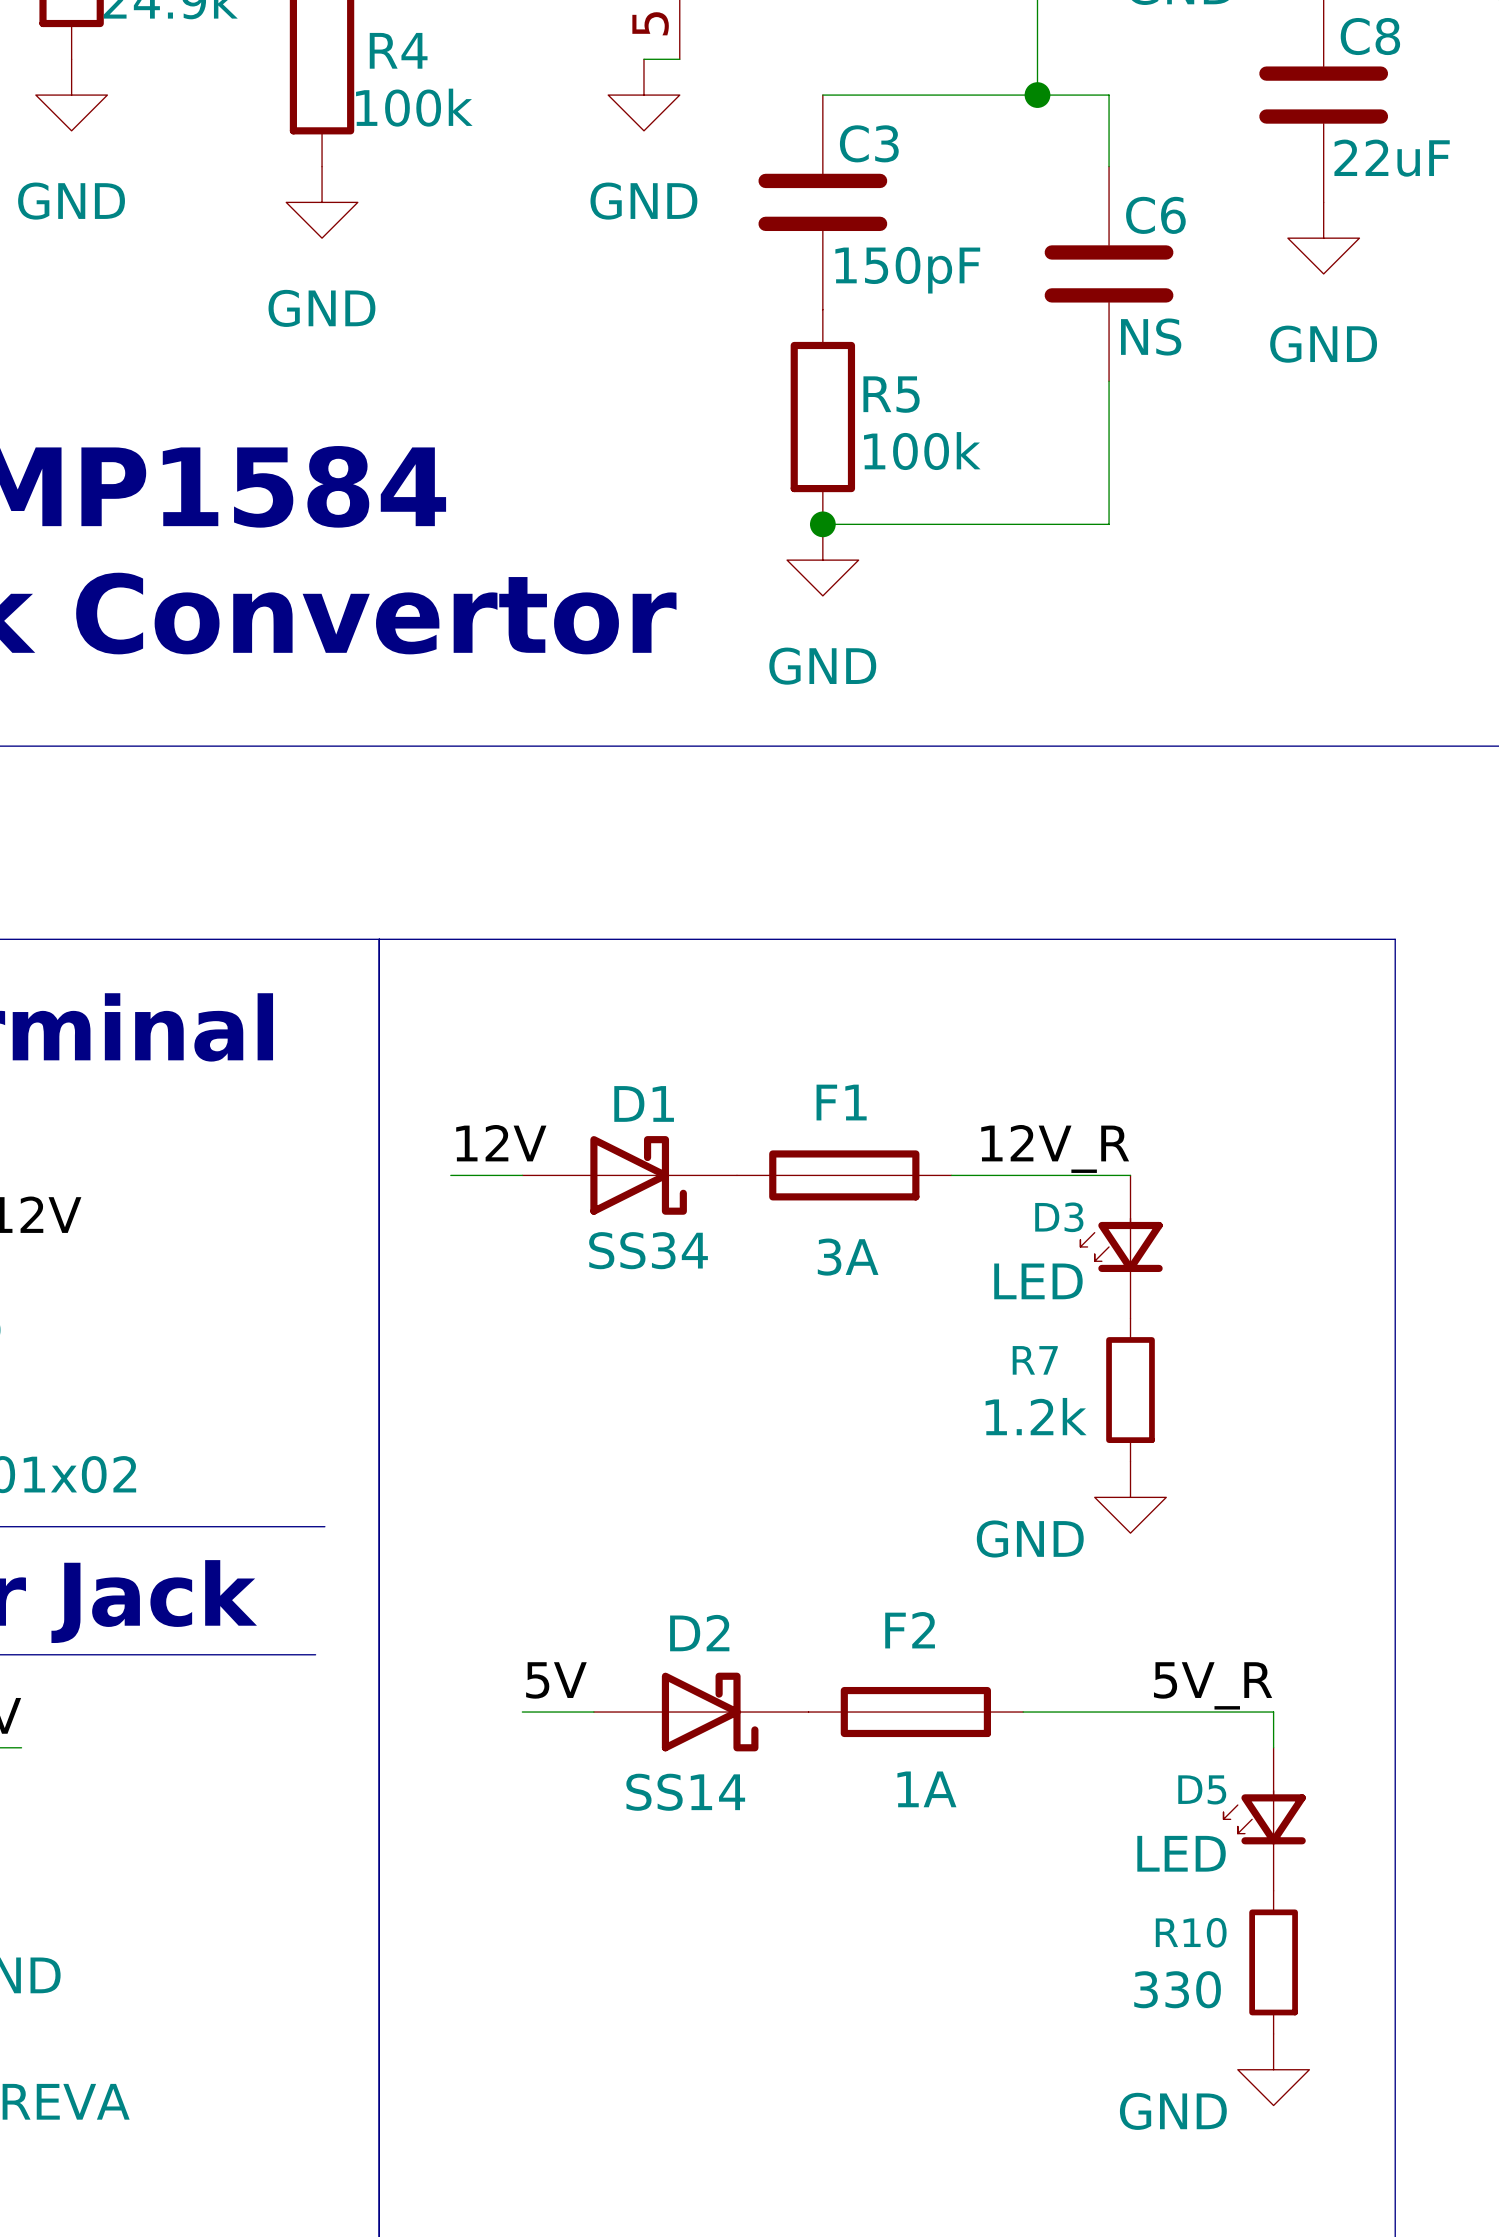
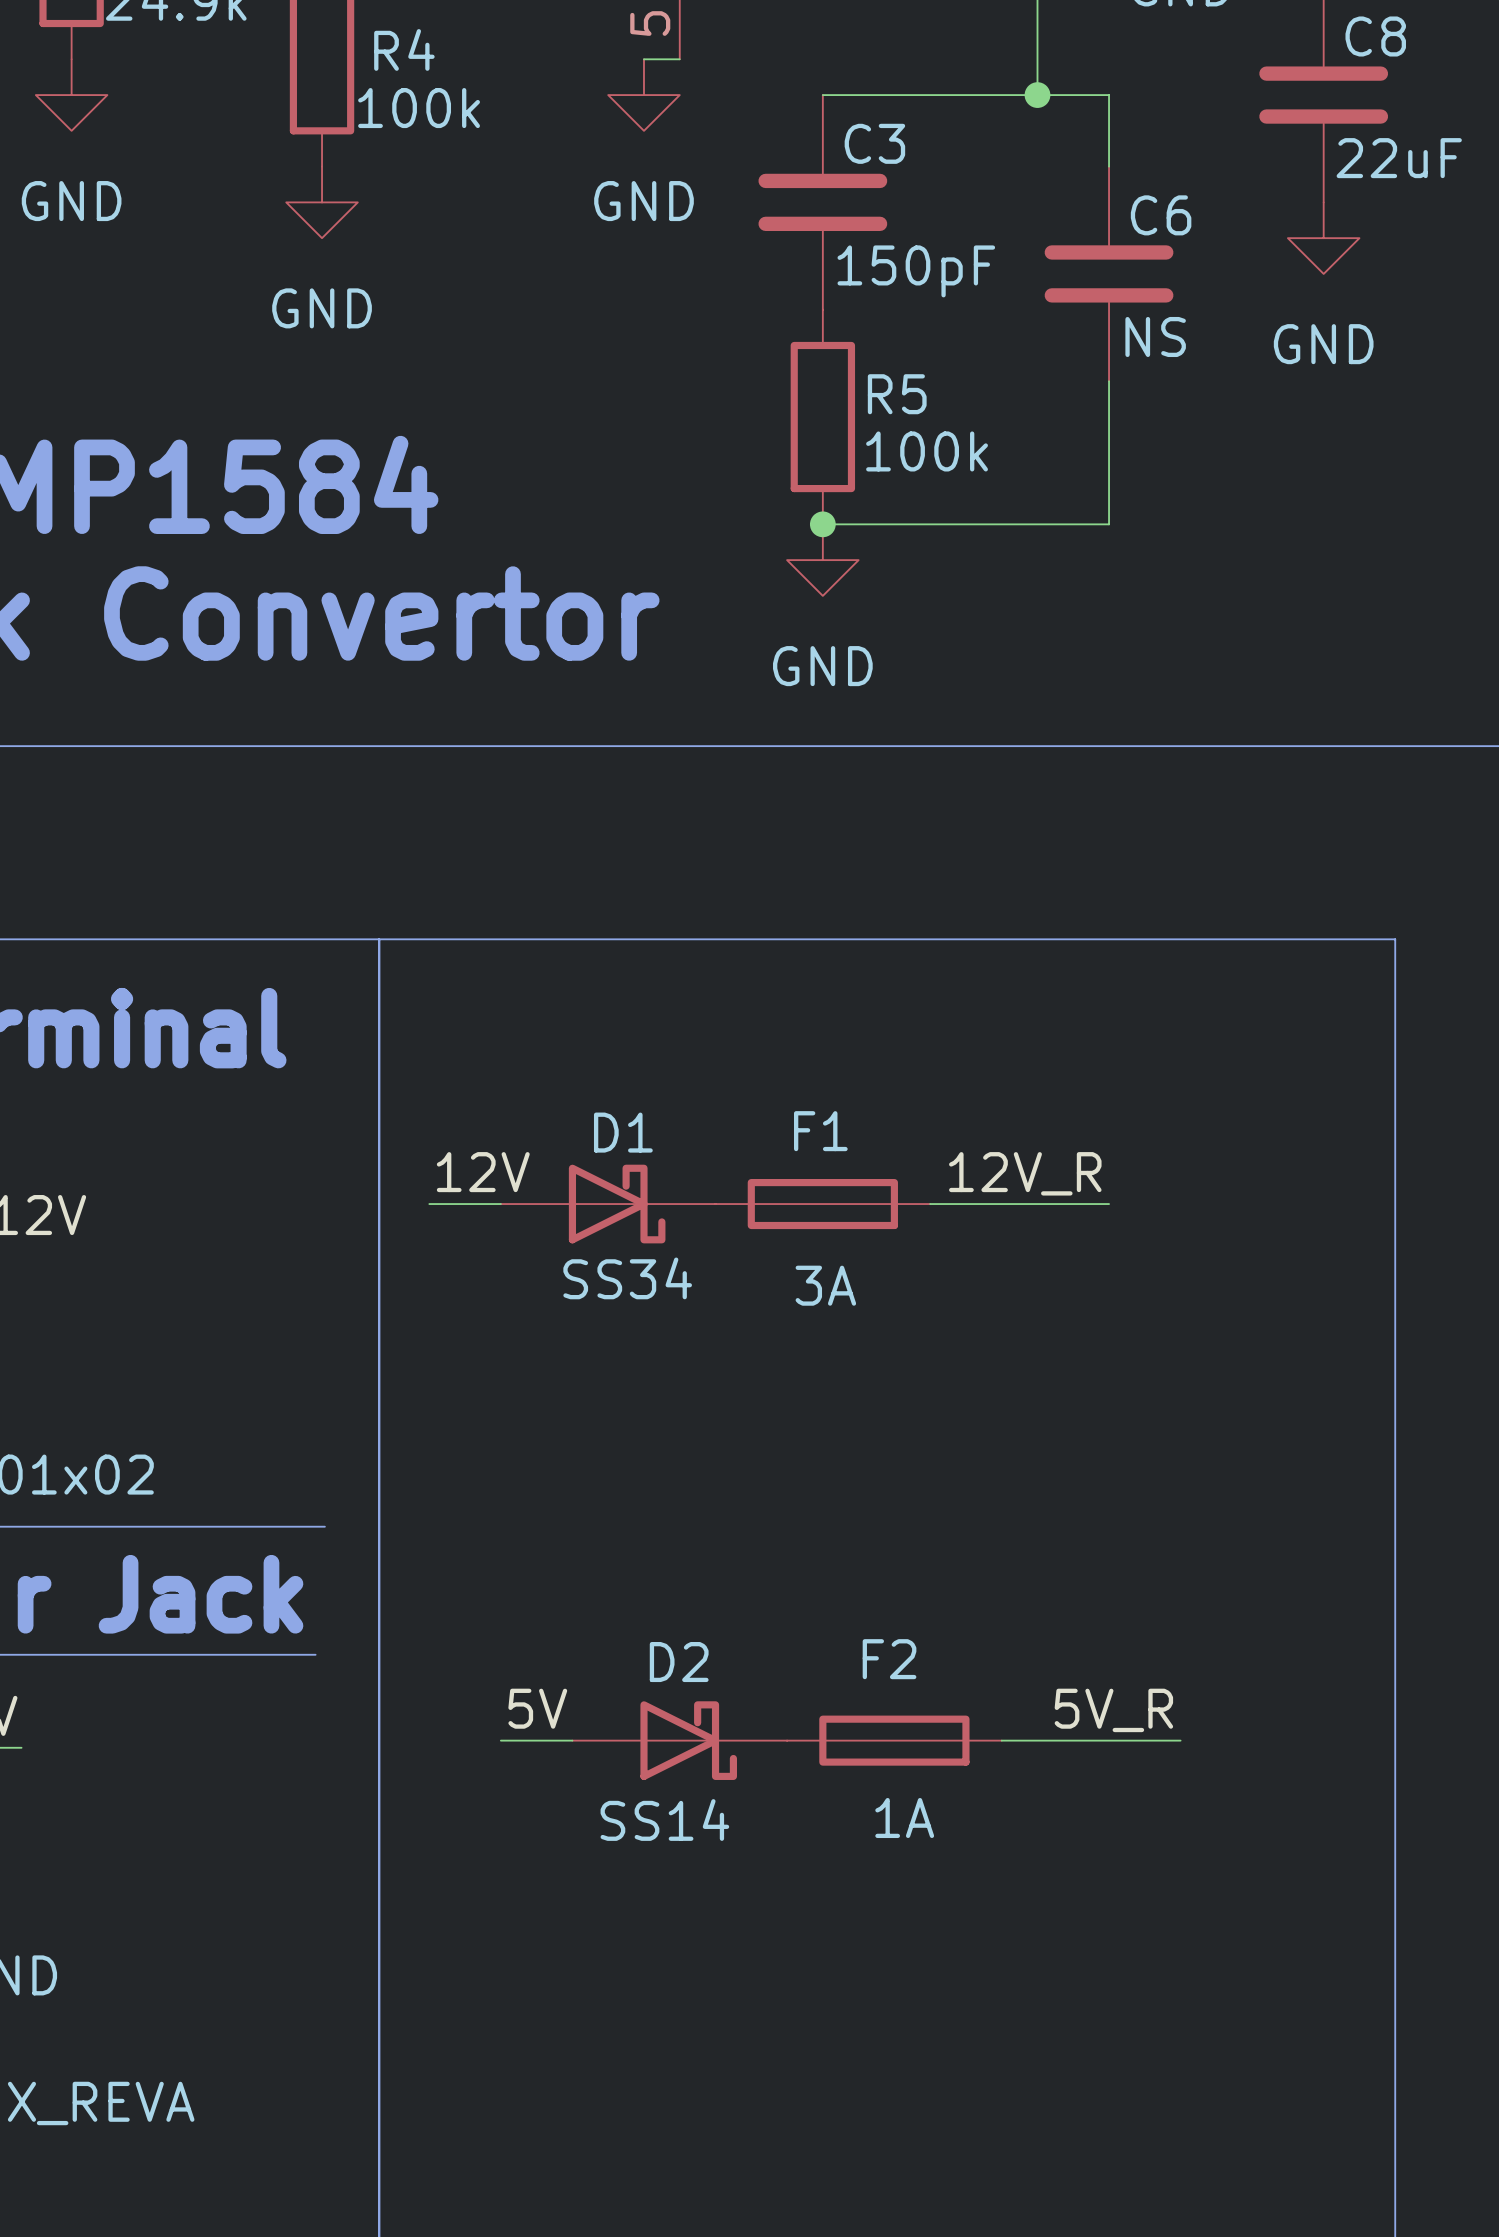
label position: 12V (501, 1143) -> 12V (483, 1172)
label position: 12V_R (1055, 1148) -> 12V_R (1025, 1173)
wire: (450, 1175) (522, 1175) -> (429, 1204) (500, 1204)
D1 position: (629, 1175) -> (608, 1204)
F1 position: (844, 1175) -> (822, 1204)
wire: (951, 1175) (1130, 1175) -> (930, 1204) (1109, 1204)
D3: LED (1121, 1246) -> none
R7: 1.2k (1130, 1390) -> none
power symbol: GND (1130, 1497) -> none
label position: 5V (556, 1680) -> 5V (537, 1708)
label position: 5V_R (1213, 1685) -> 5V_R (1113, 1710)
wire: (522, 1712) (593, 1712) -> (500, 1740) (572, 1740)
D2 position: (701, 1712) -> (679, 1740)
F2 position: (915, 1712) -> (894, 1740)
wire: (1023, 1712) (1273, 1712) (1273, 1747) -> none
wire: none -> (1001, 1740) (1180, 1740)
D5: LED (1264, 1819) -> none
R10: 330 (1273, 1962) -> none
power symbol: GND (1273, 2069) -> none

